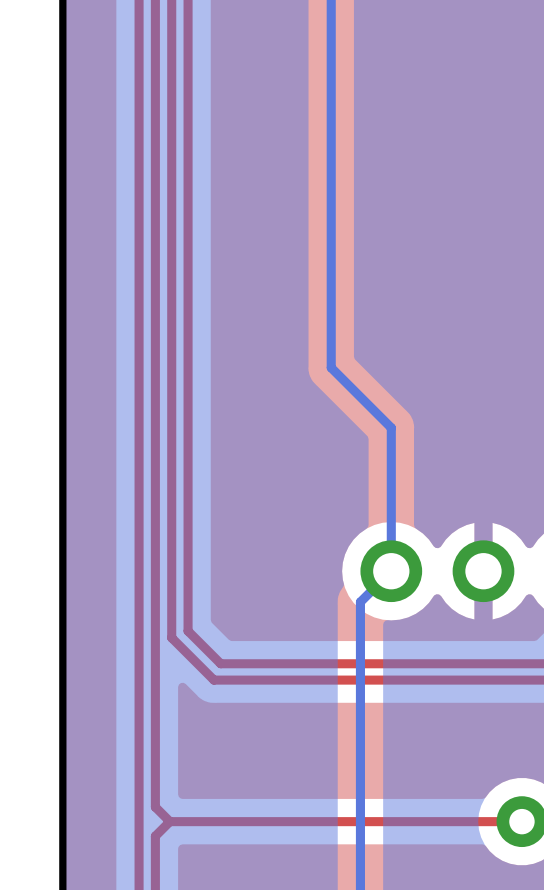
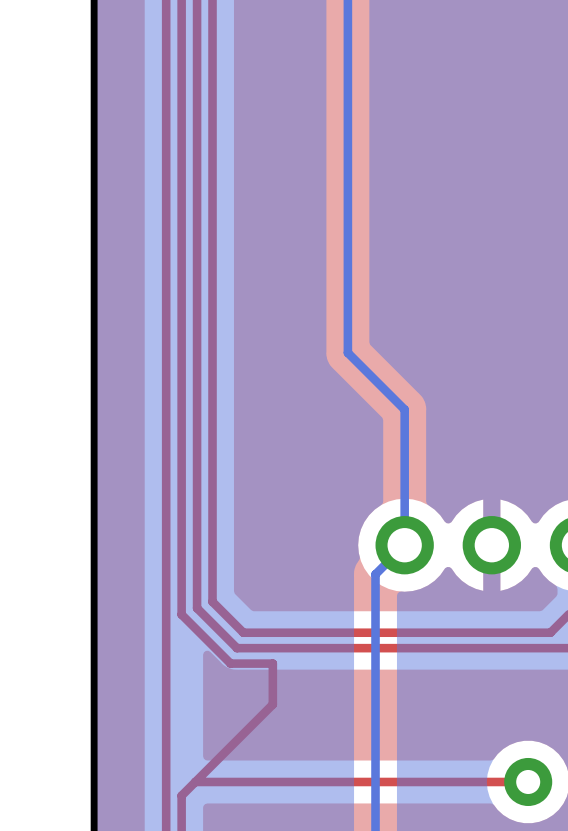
top track: (155, 644) (155, 807) (169, 821) -> (181, 614) (230, 663) (272, 663) (272, 704) (195, 781)

